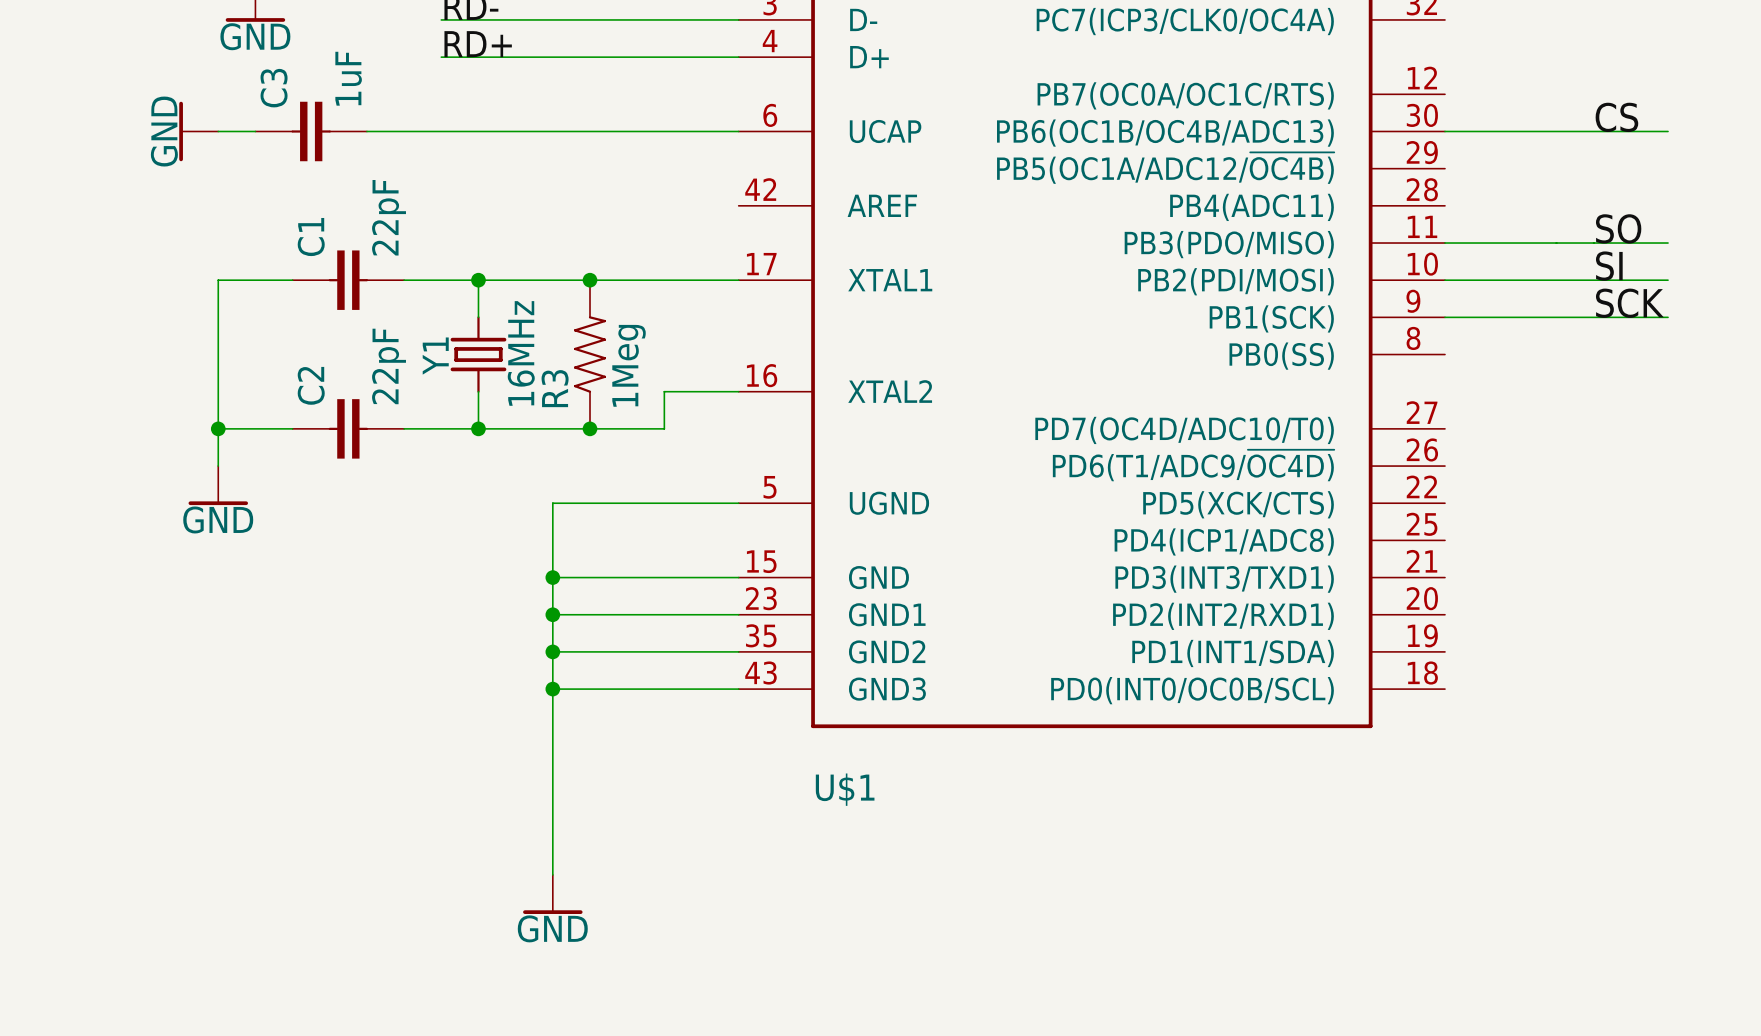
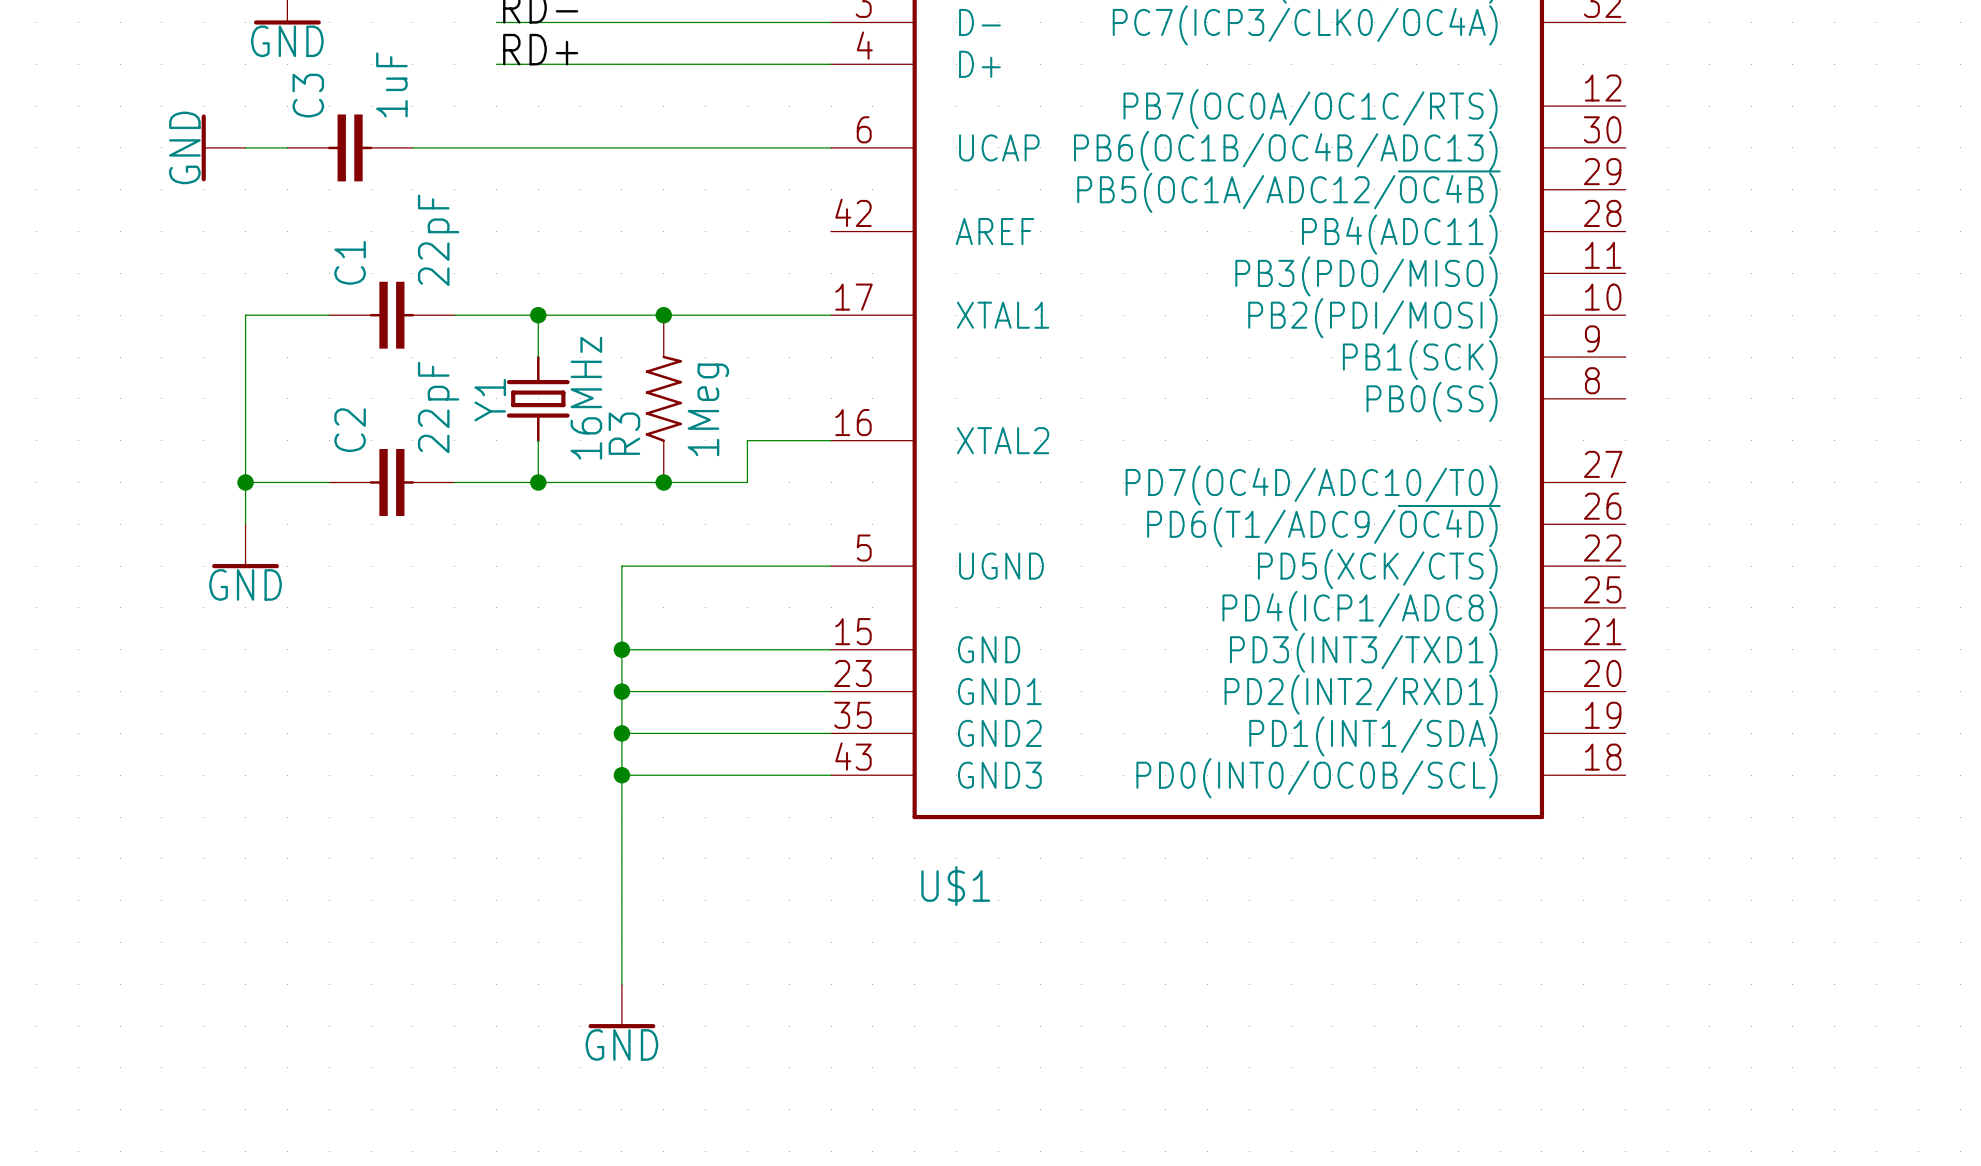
label: CS (1616, 117) -> none
wire: (1444, 131) (1668, 131) -> none
label: SO (1618, 228) -> none
wire: (1444, 243) (1668, 243) -> none
label: SI (1609, 266) -> none
wire: (1444, 280) (1668, 280) -> none
label: SCK (1629, 303) -> none
wire: (1444, 317) (1668, 317) -> none

